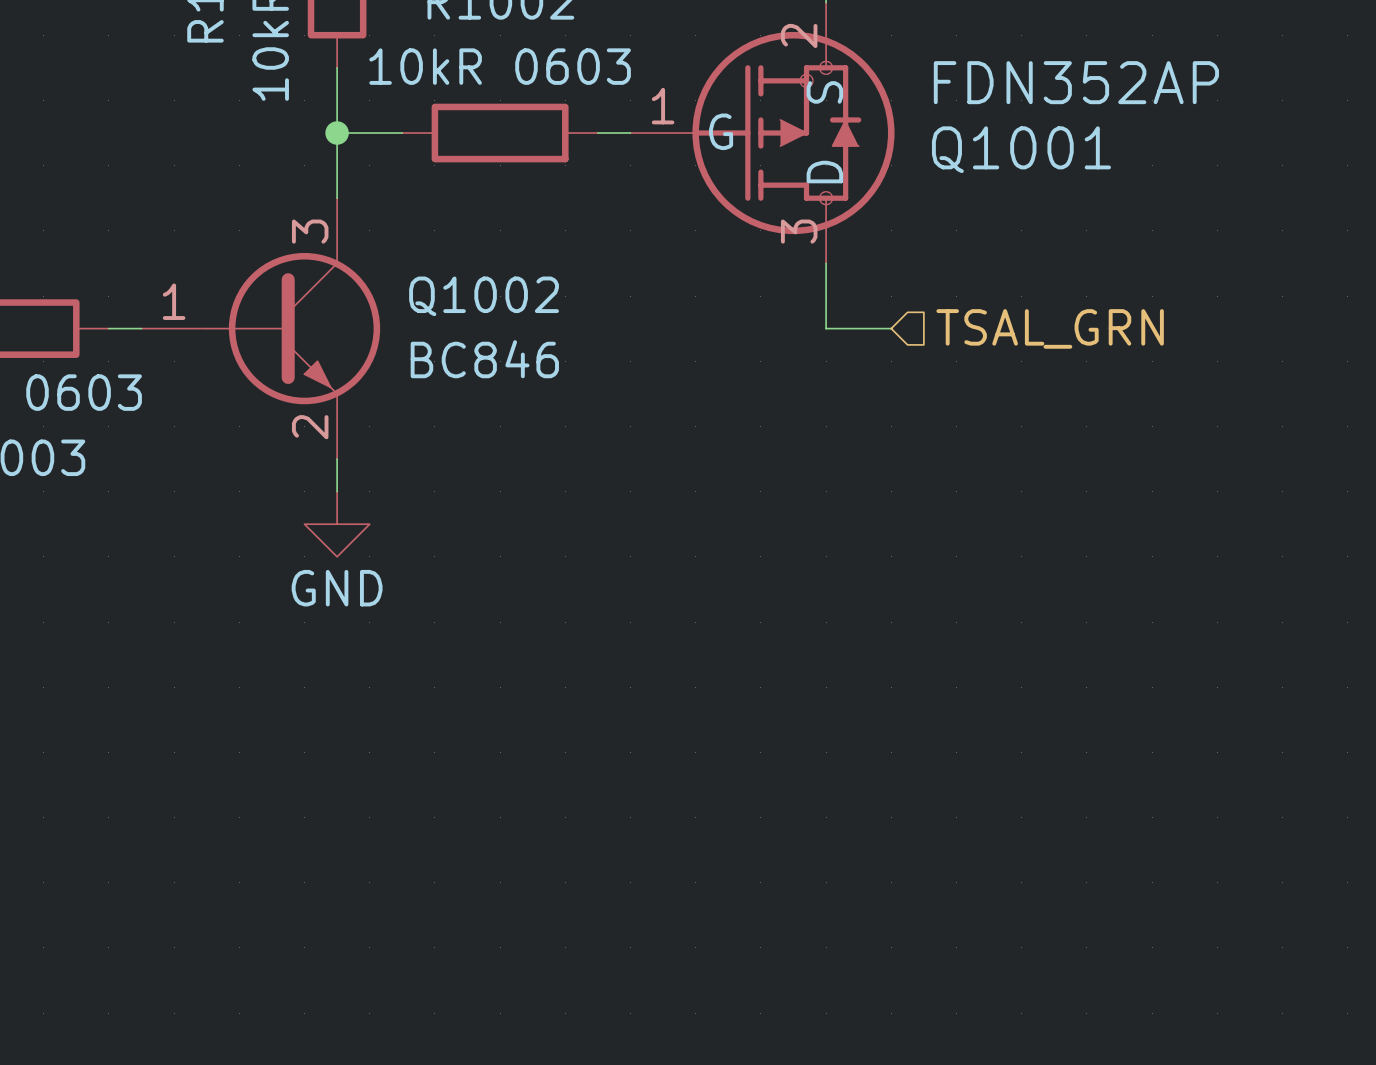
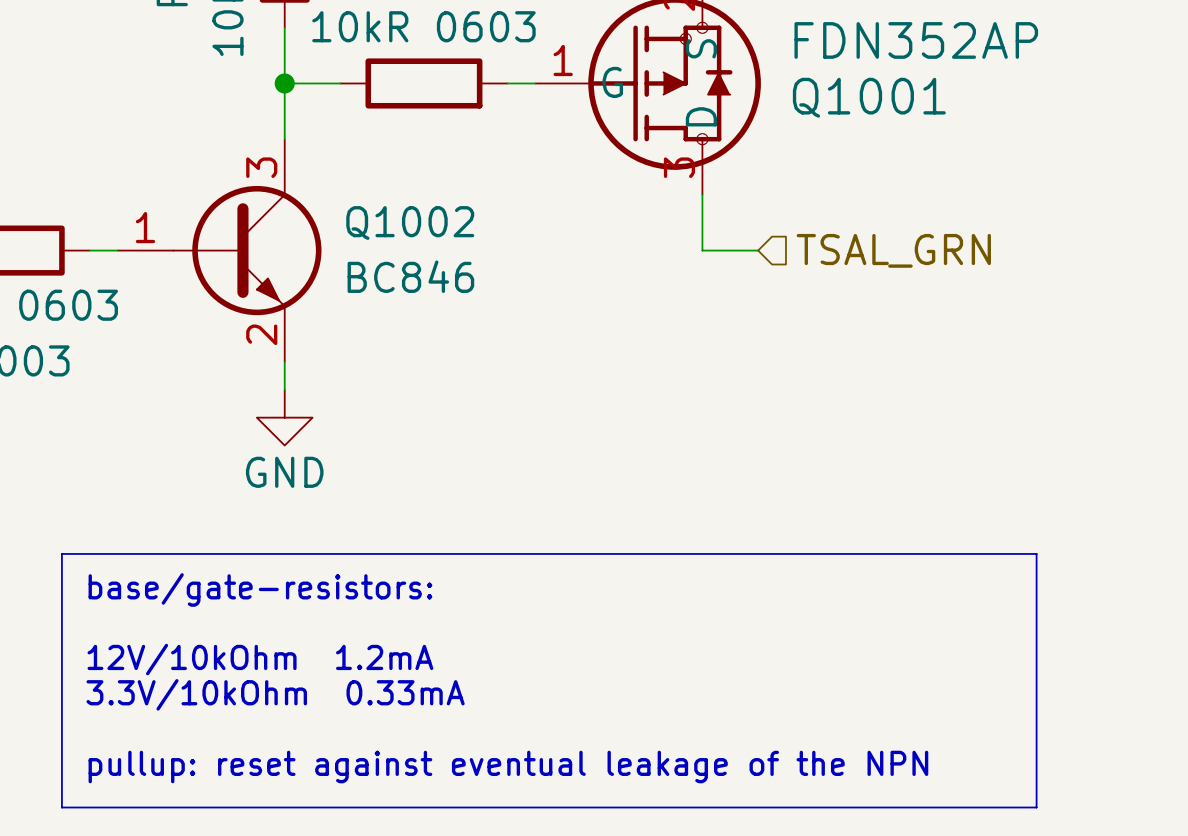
line: none -> (61, 553) (1036, 553) (1036, 807) (61, 807) (61, 553)
text: none -> base/gate-resistors: (260, 589)
text: none -> 12V/10kOhm 1.2mA (260, 659)
text: none -> 3.3V/10kOhm 0.33mA (275, 694)
text: none -> pullup: reset against eventual leakage of the NPN (508, 767)

